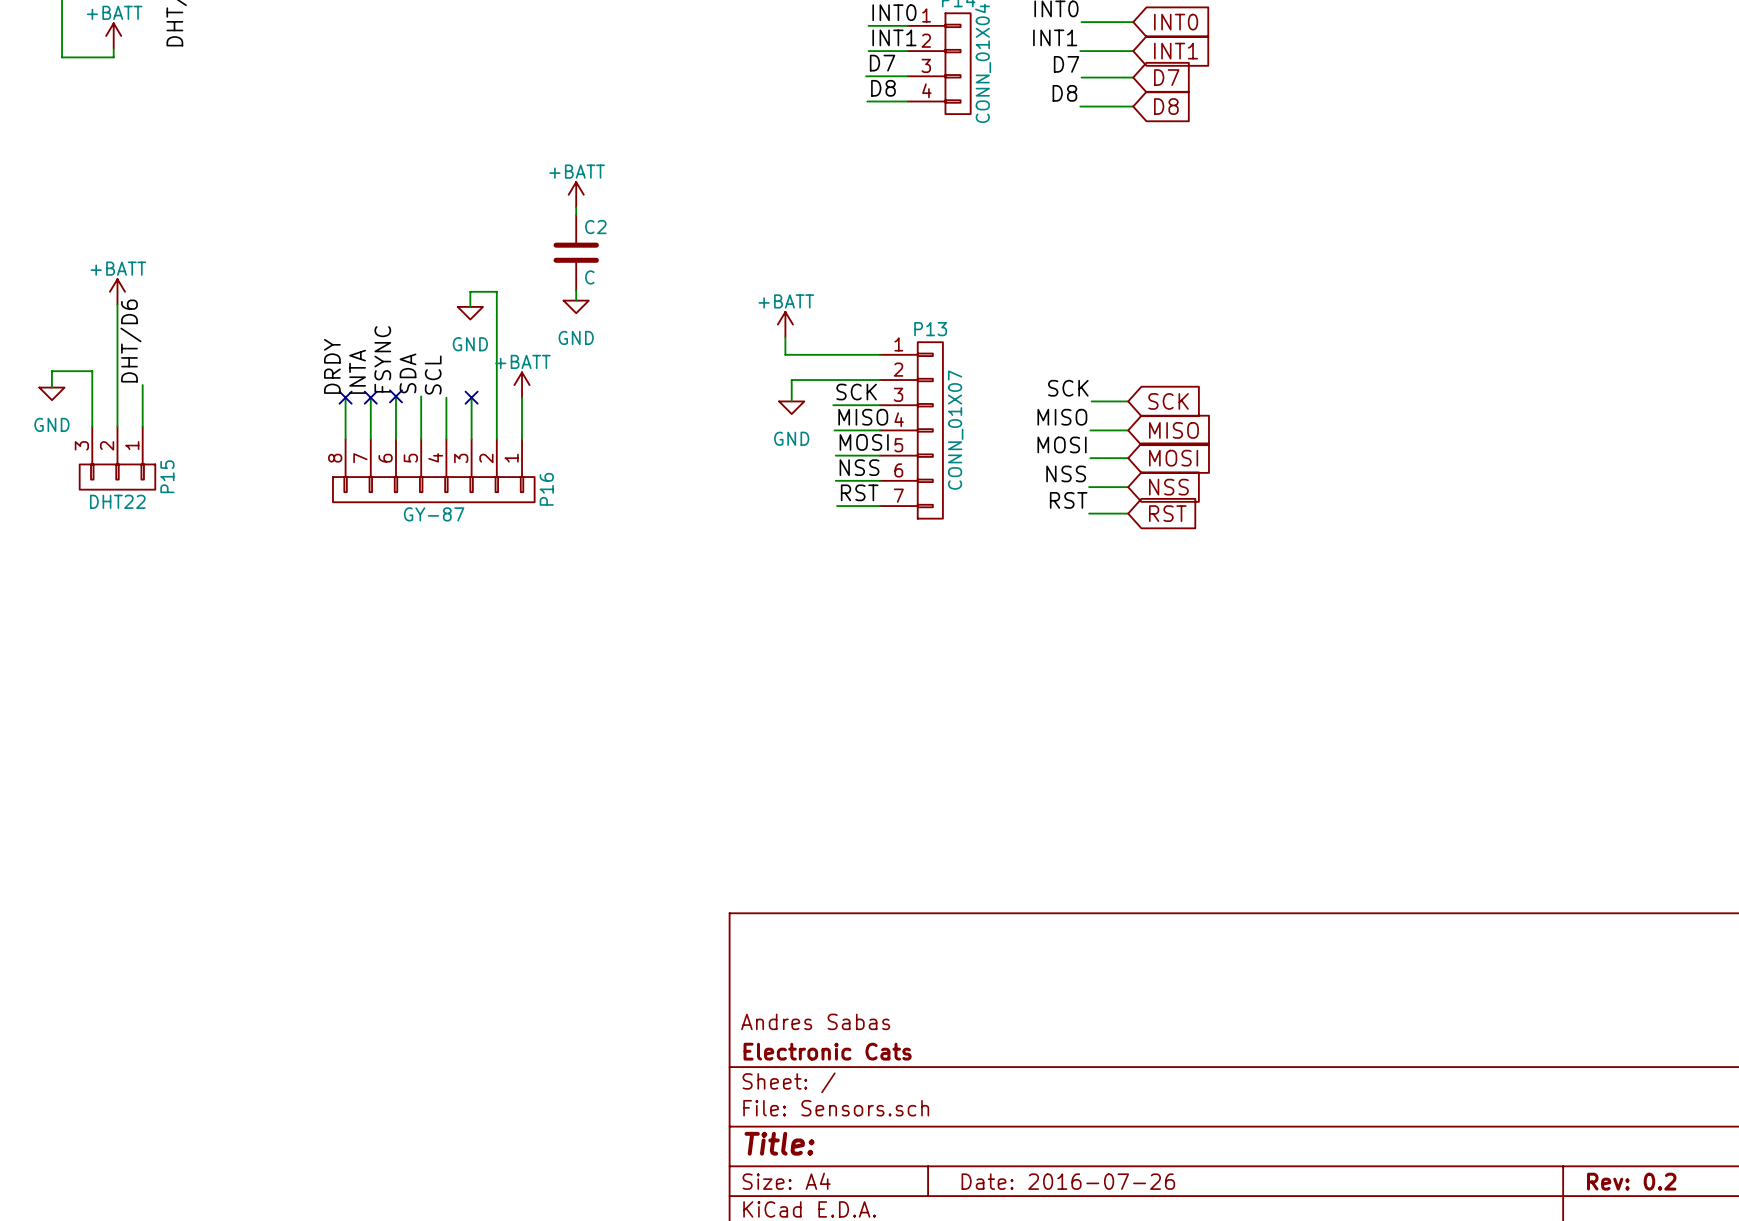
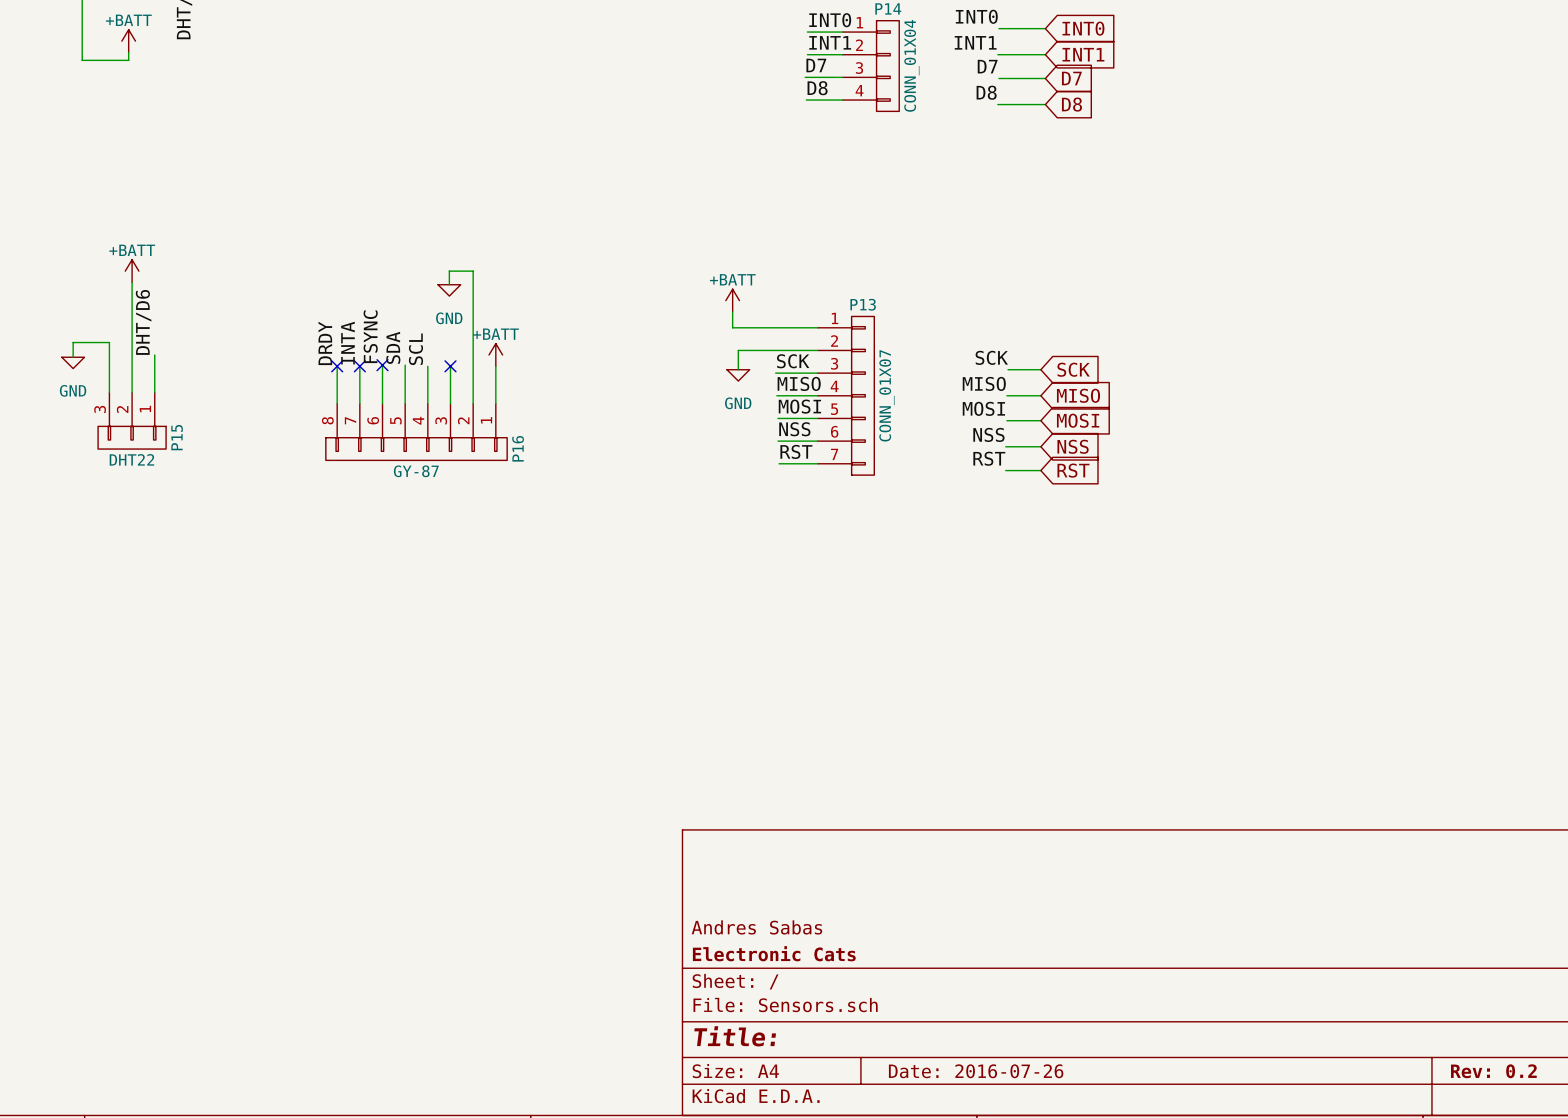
power symbol: +BATT (576, 194) -> none
wire: (576, 207) (576, 214) -> none
C2: C (576, 252) -> none
wire: (576, 290) (576, 300) -> none
power symbol: GND (576, 306) -> none

